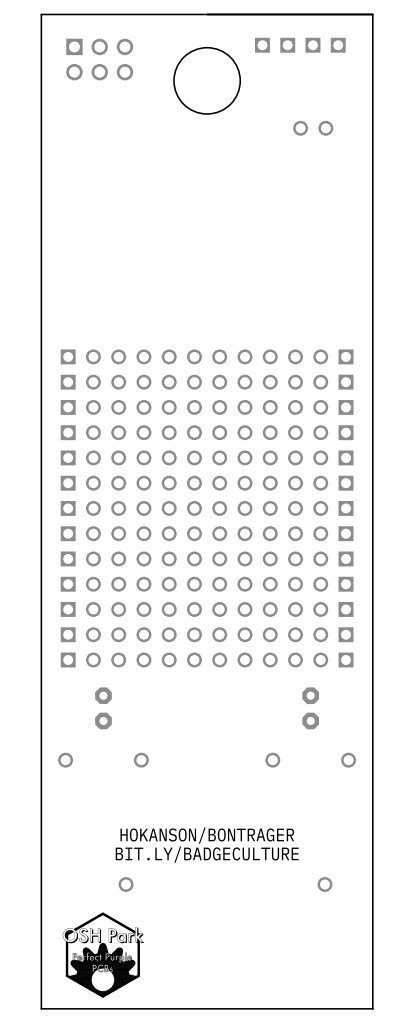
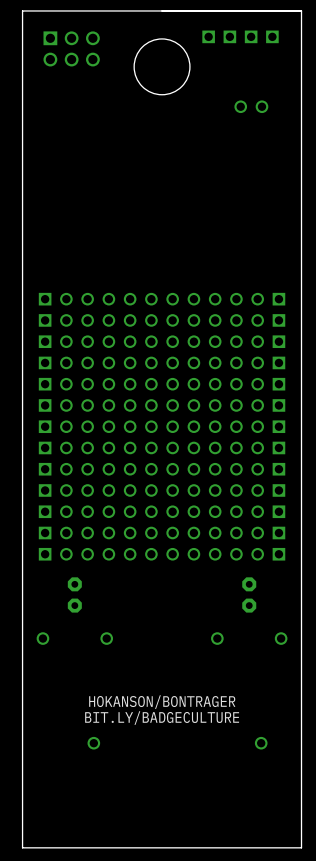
drawing: [62, 912, 145, 999] -> none

